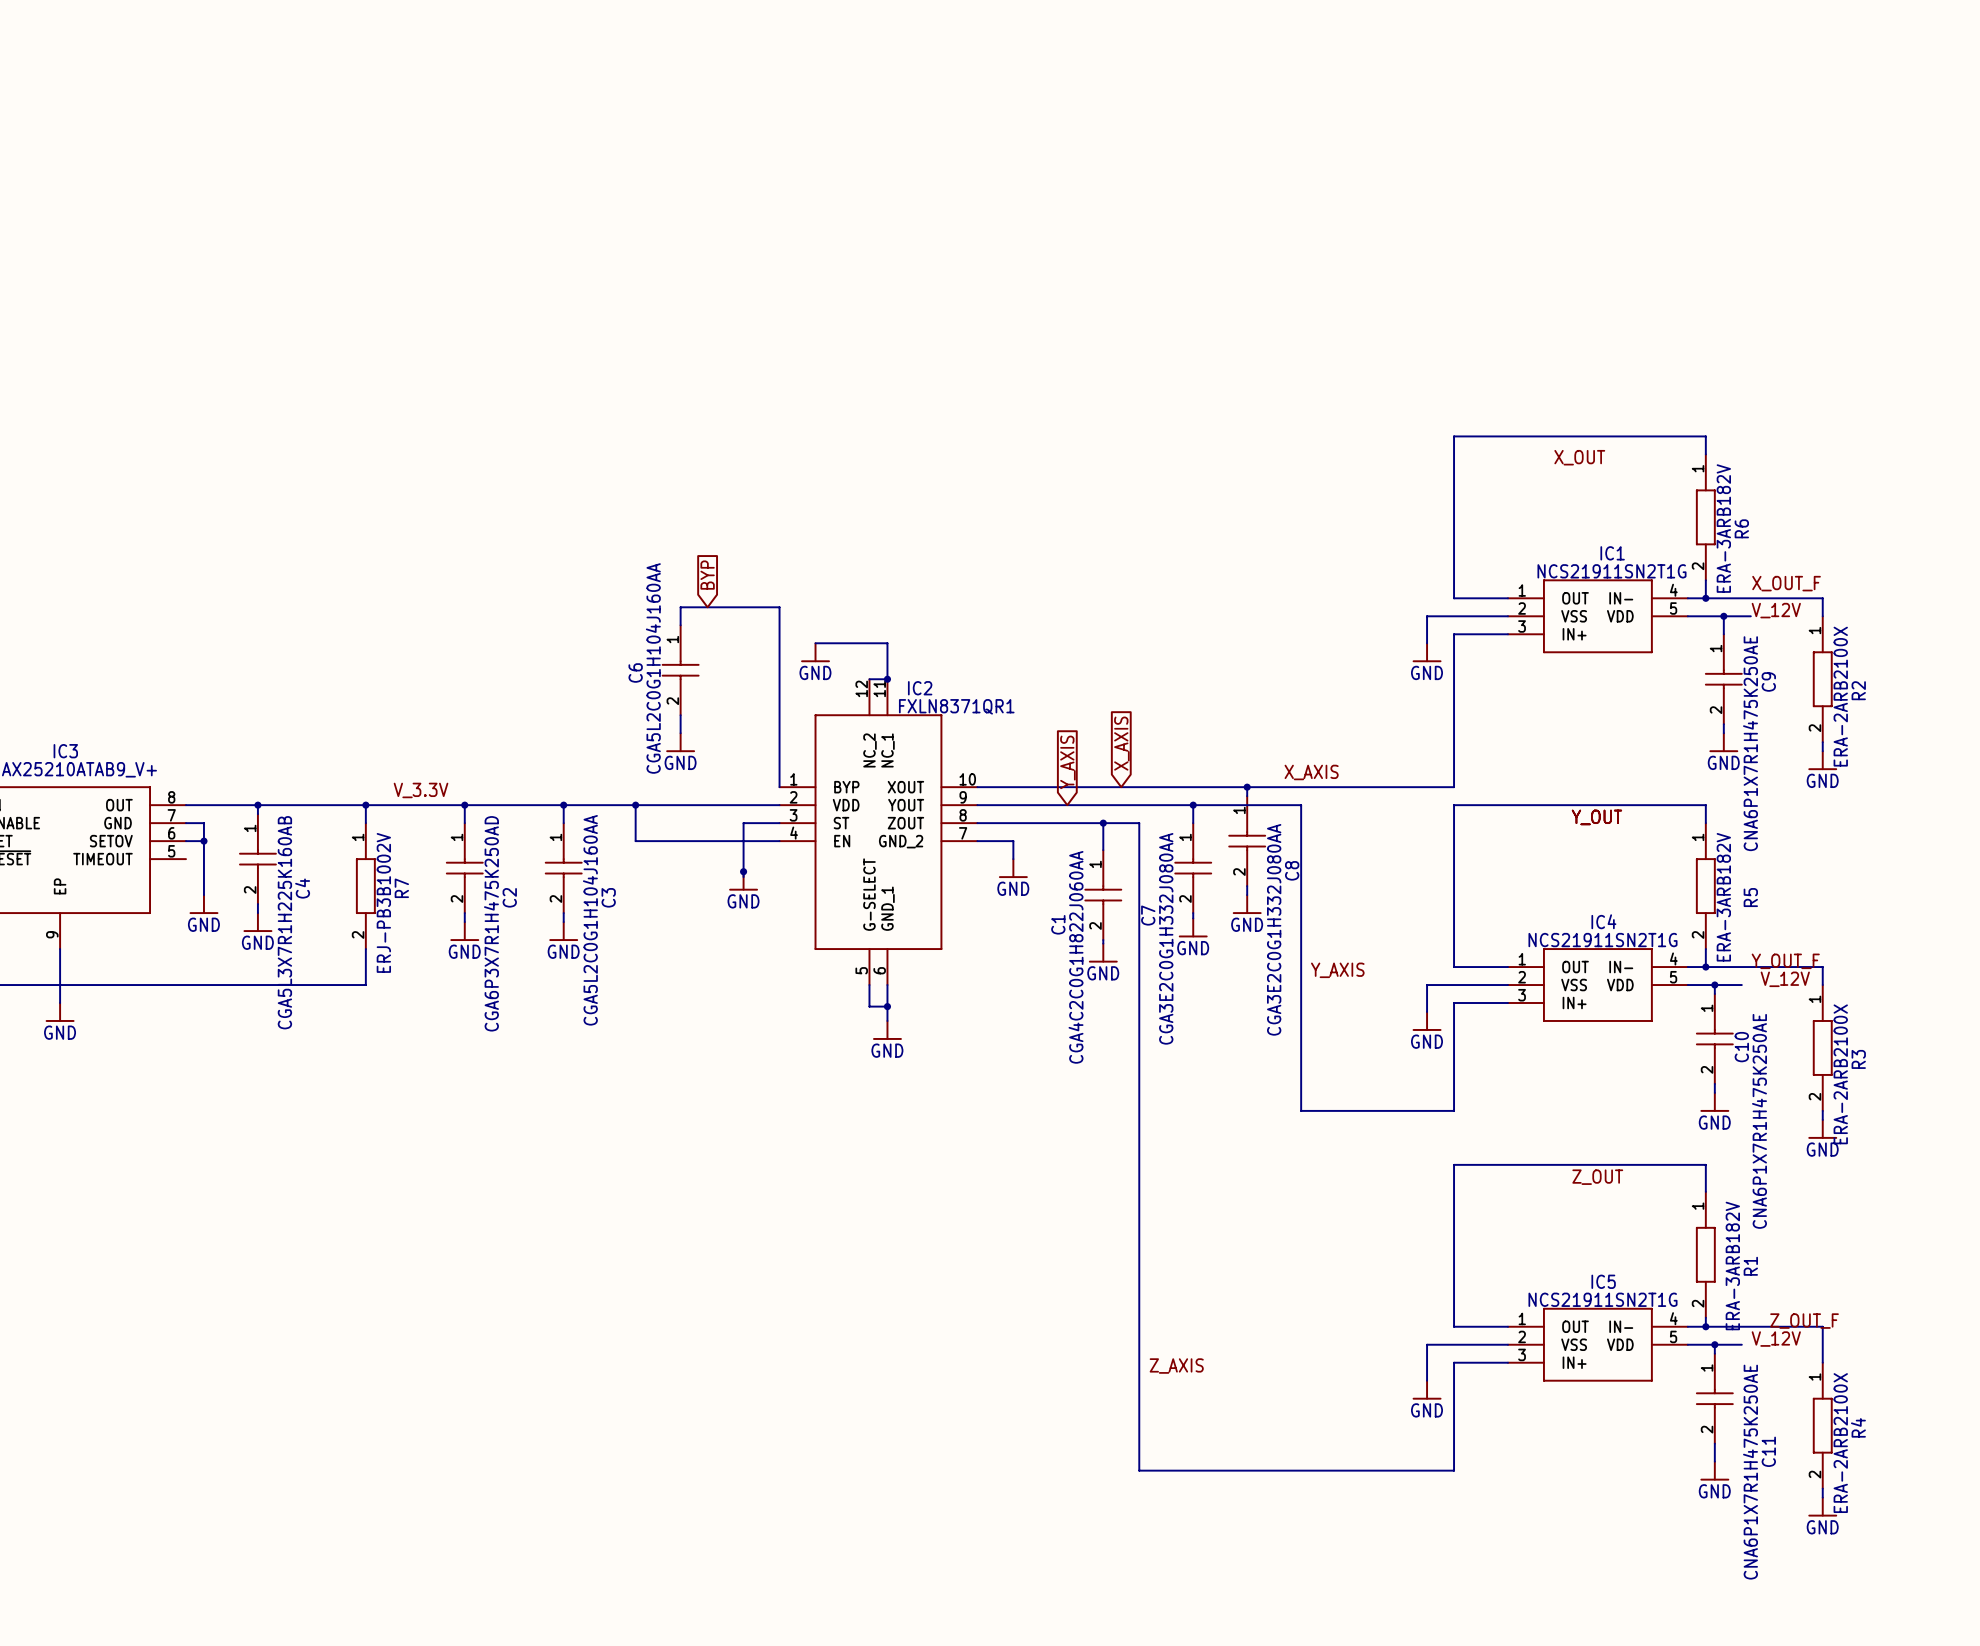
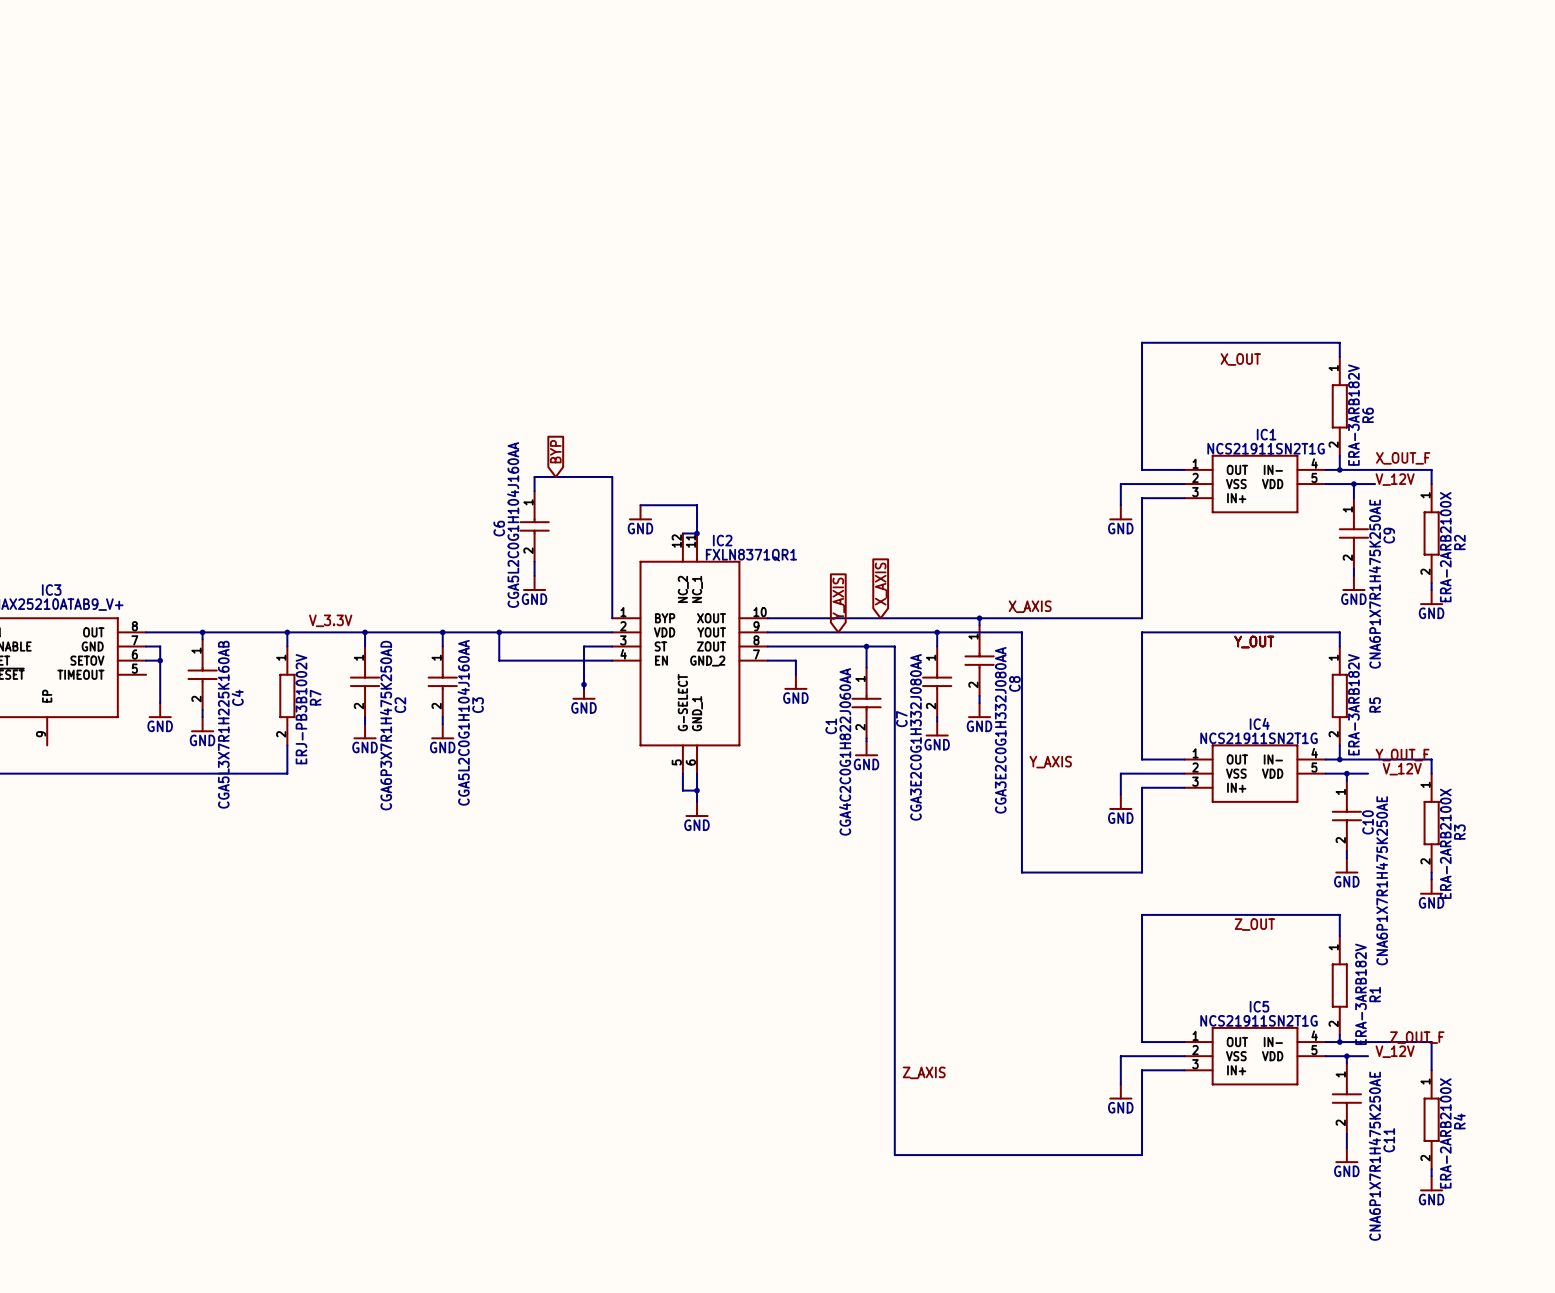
wire: (60, 949) (60, 1003) -> none
power symbol: GND (60, 1012) -> none

